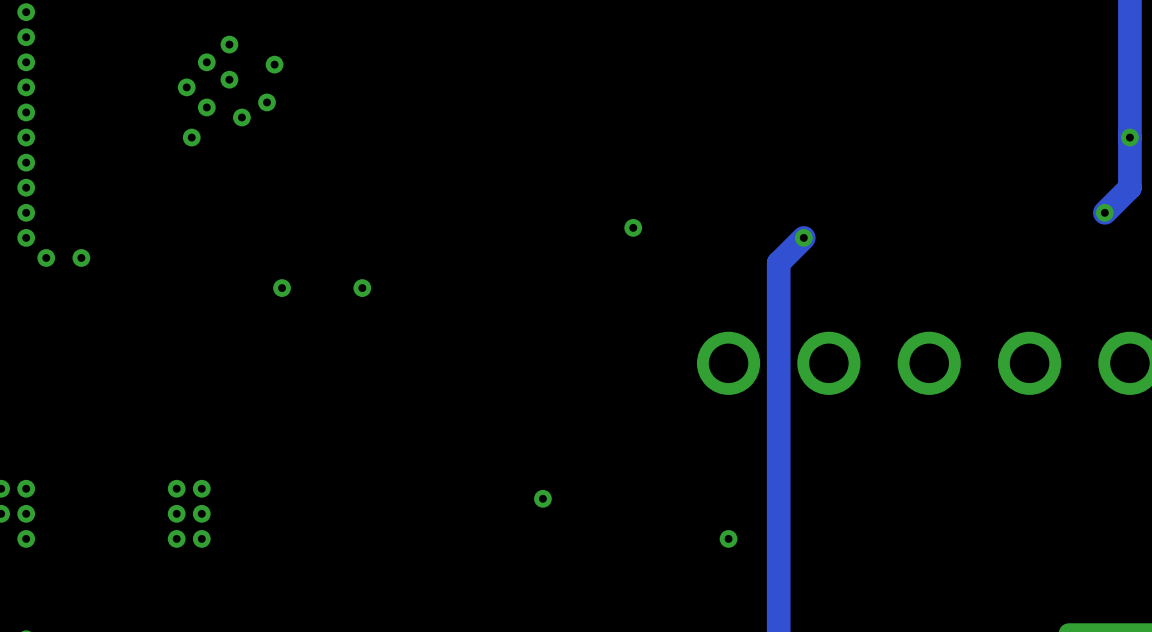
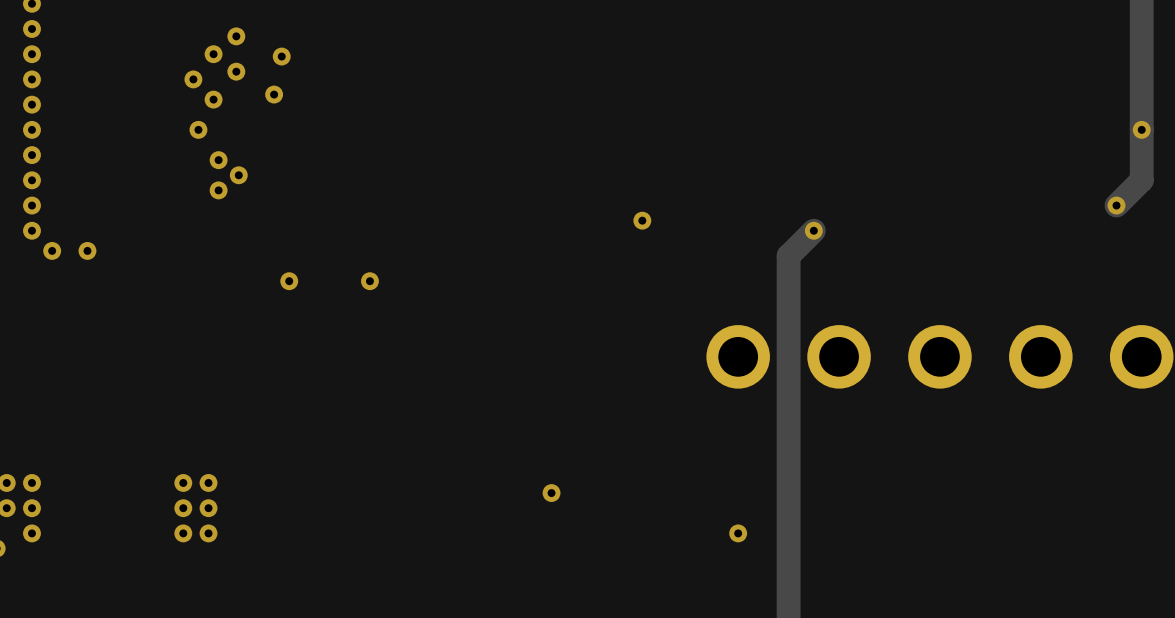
via: (241, 117) -> none
via: none -> (218, 160)
via: none -> (238, 175)
via: none -> (218, 190)

